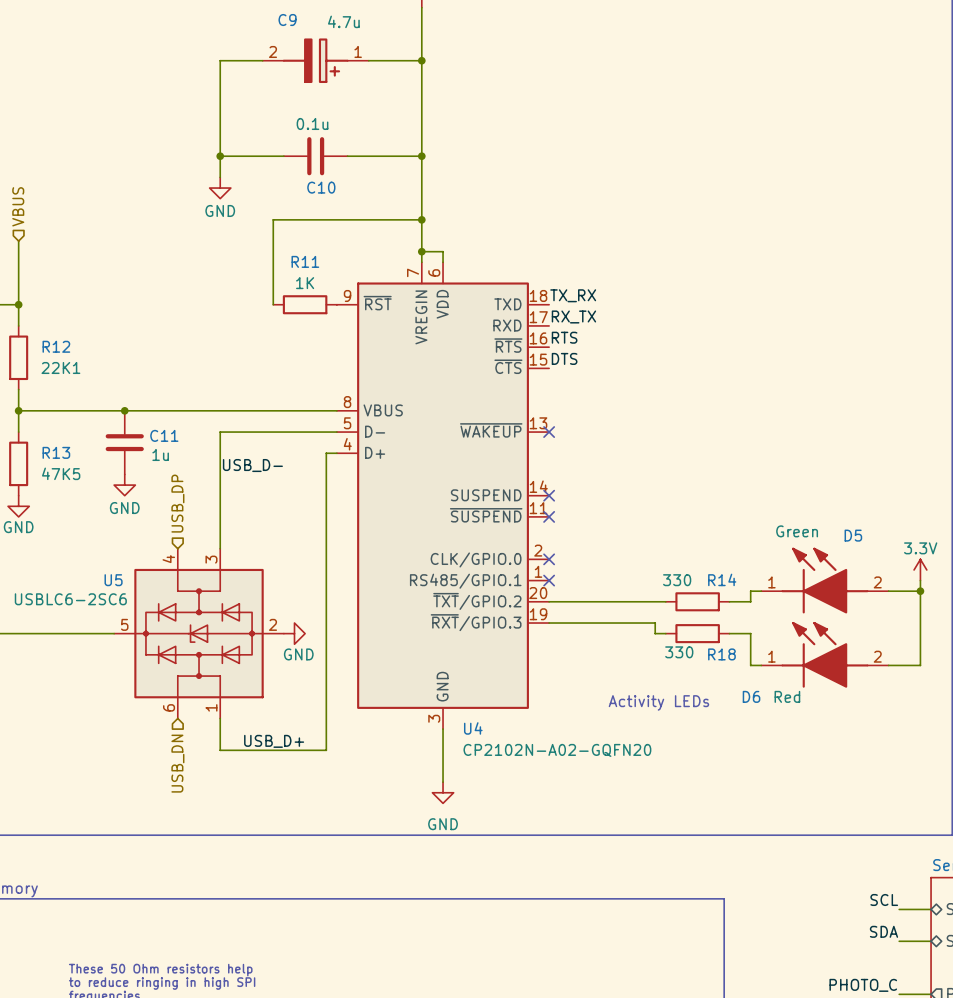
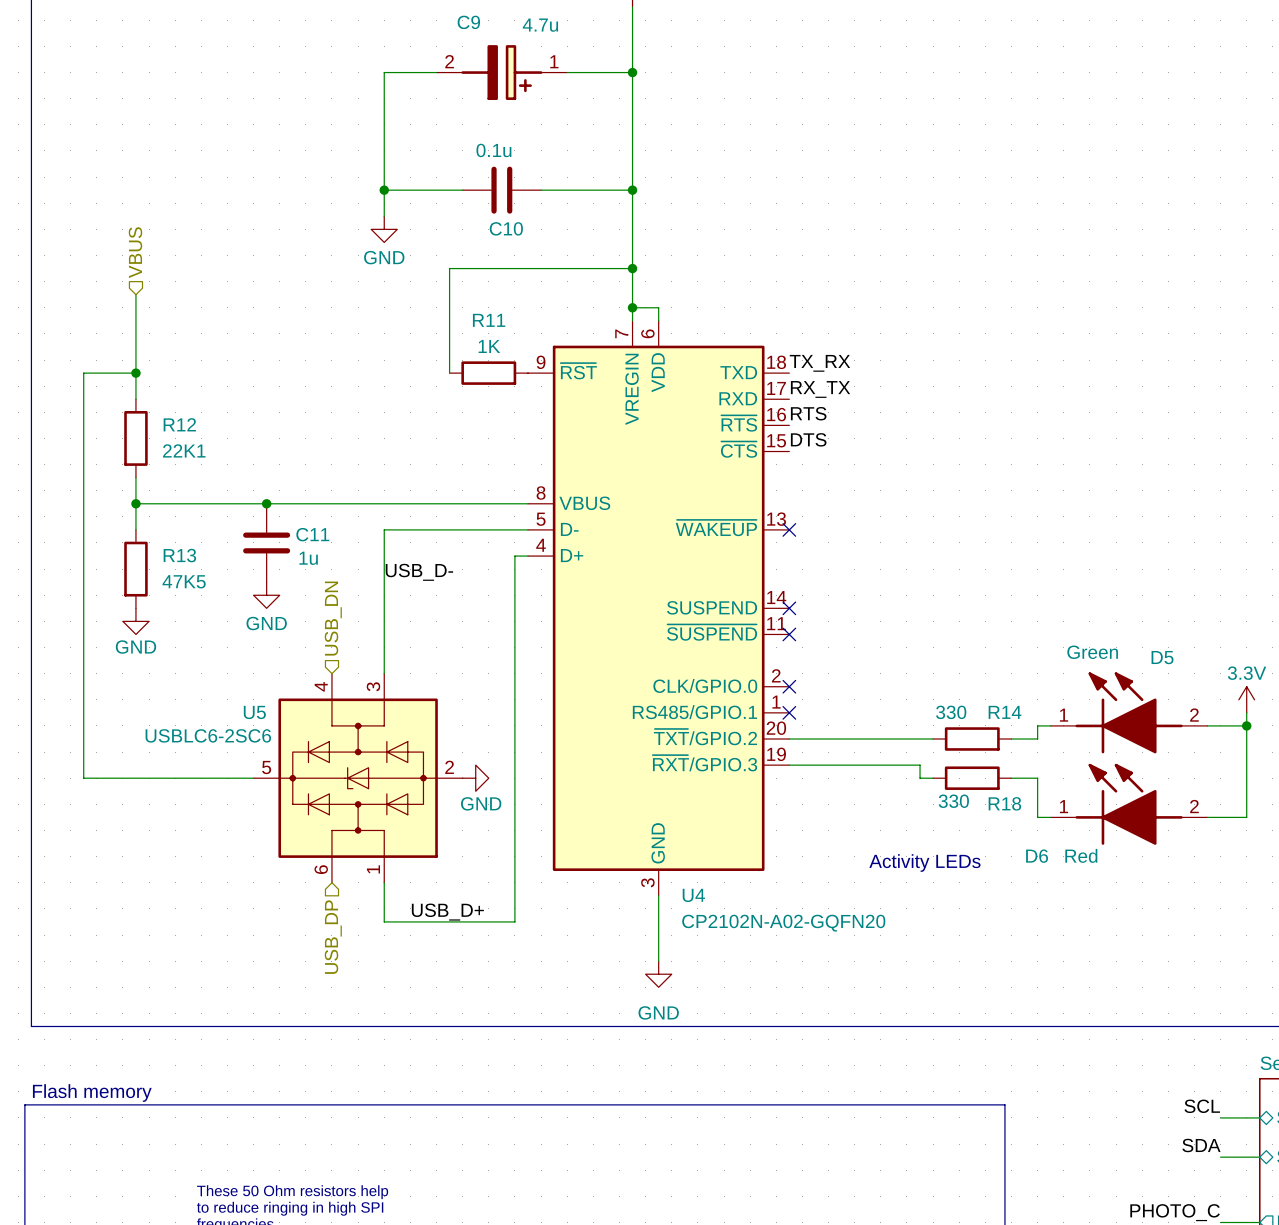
hierarchical label: USB_DP (177, 503) -> USB_DN (333, 618)
hierarchical label: USB_DN (177, 763) -> USB_DP (333, 937)

